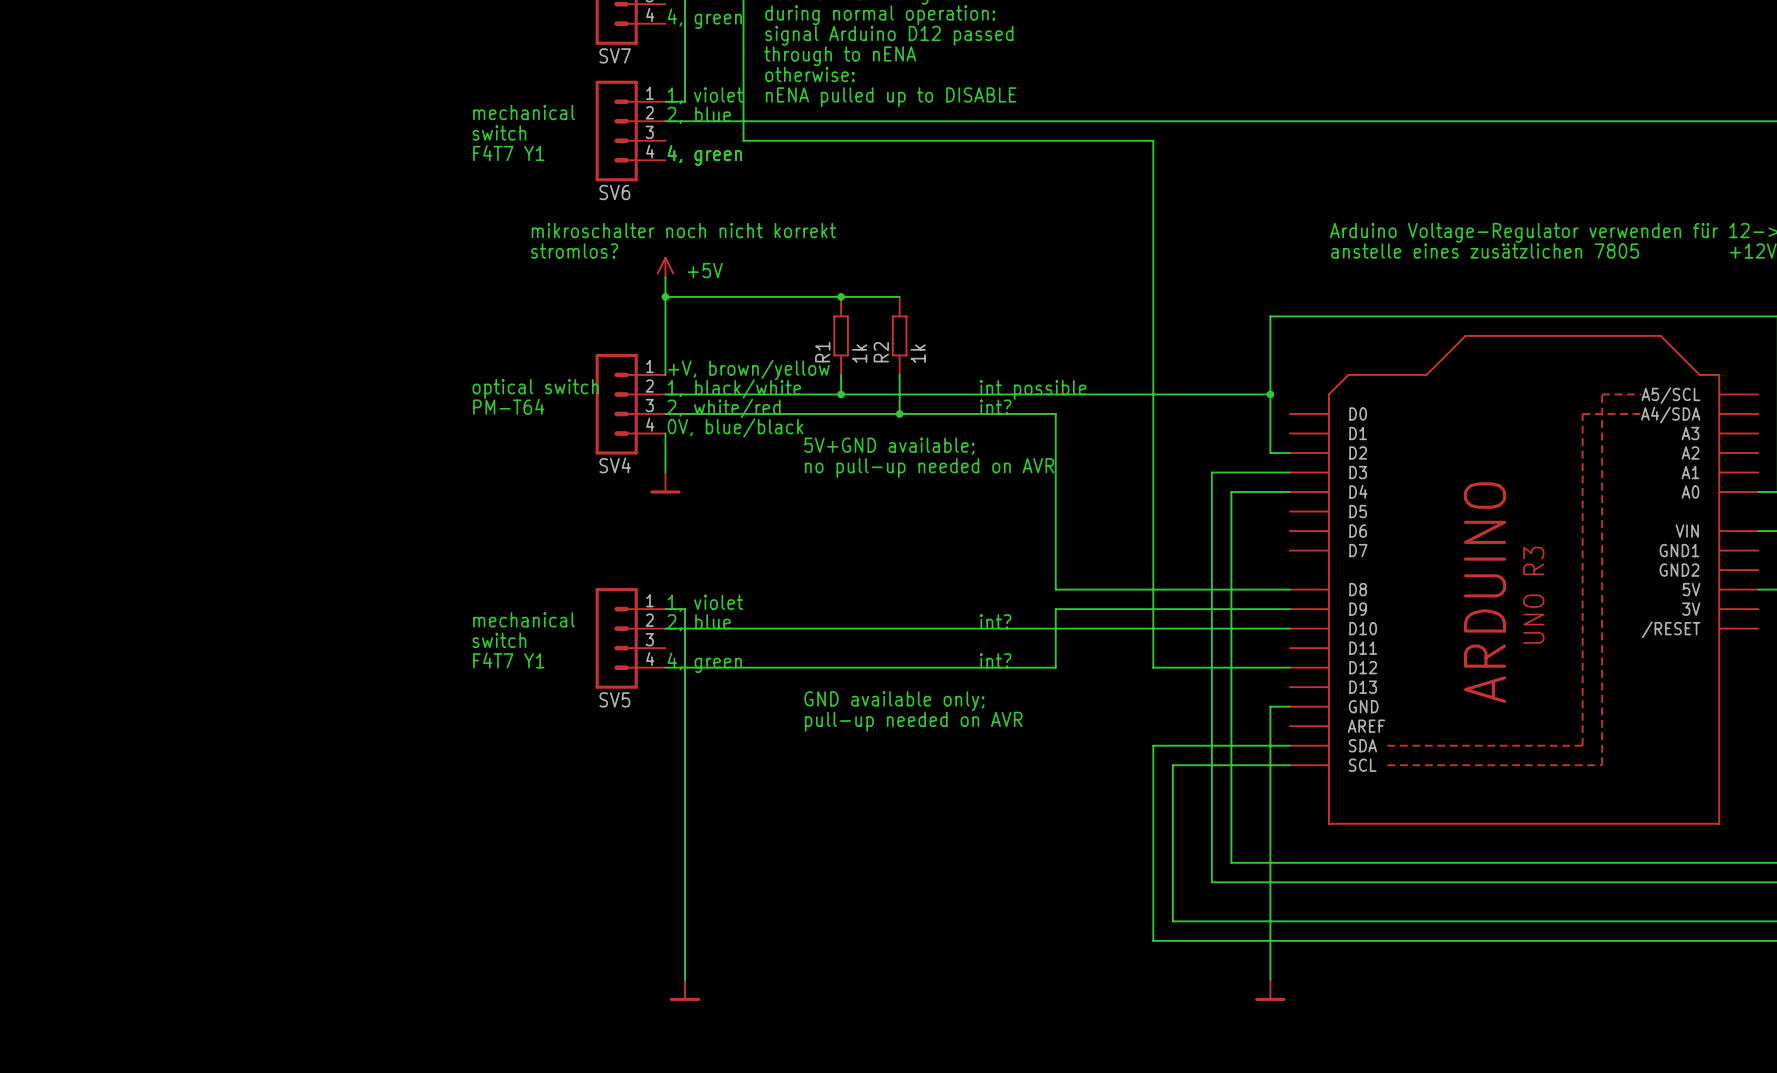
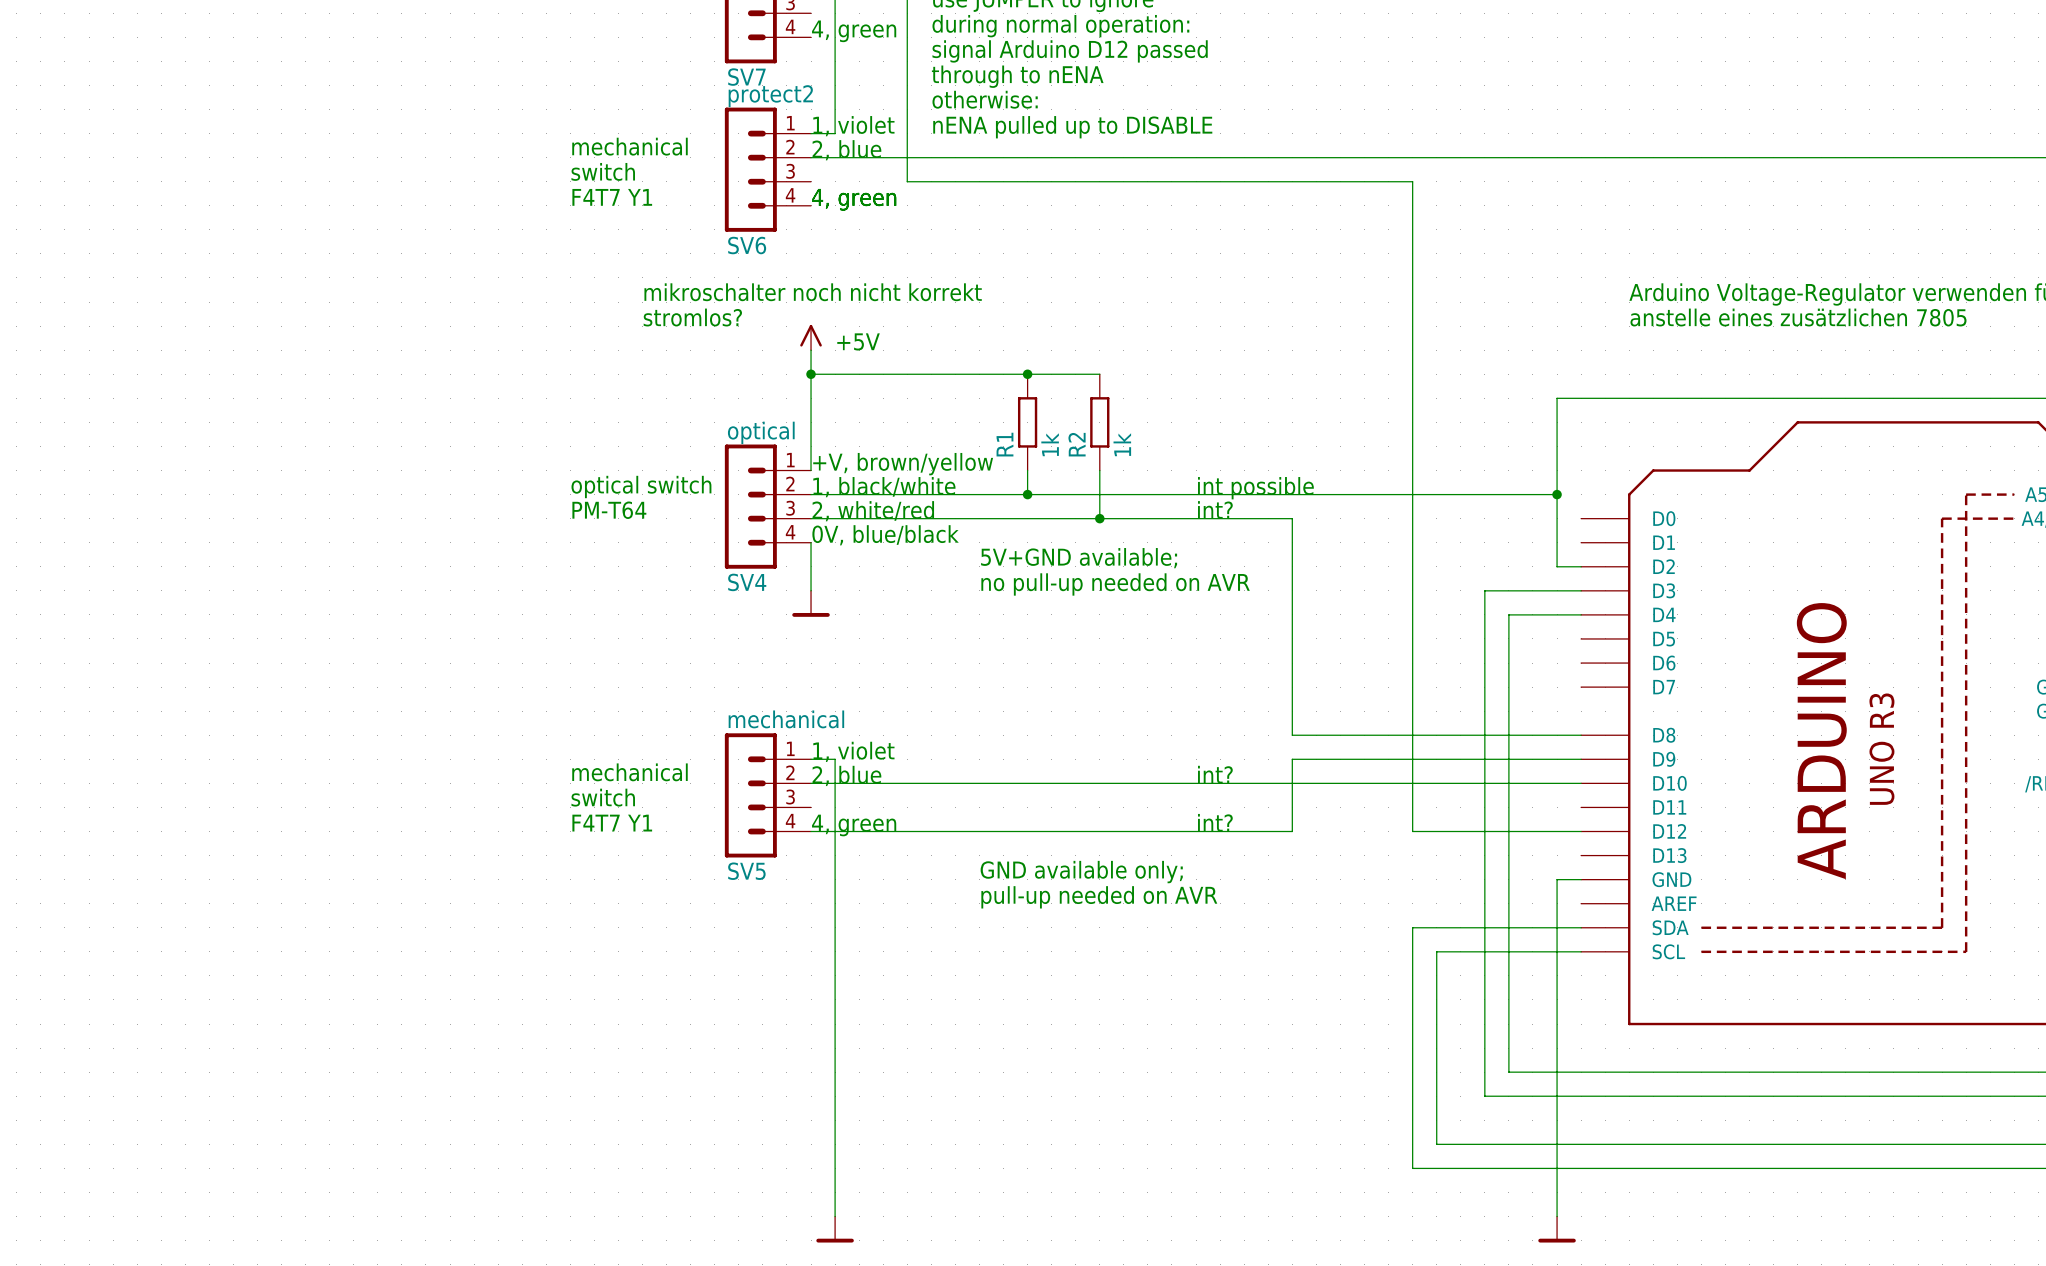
SV6 value: none -> protect2 (770, 96)
SV4 value: none -> optical (761, 432)
SV5 value: none -> mechanical (786, 719)

